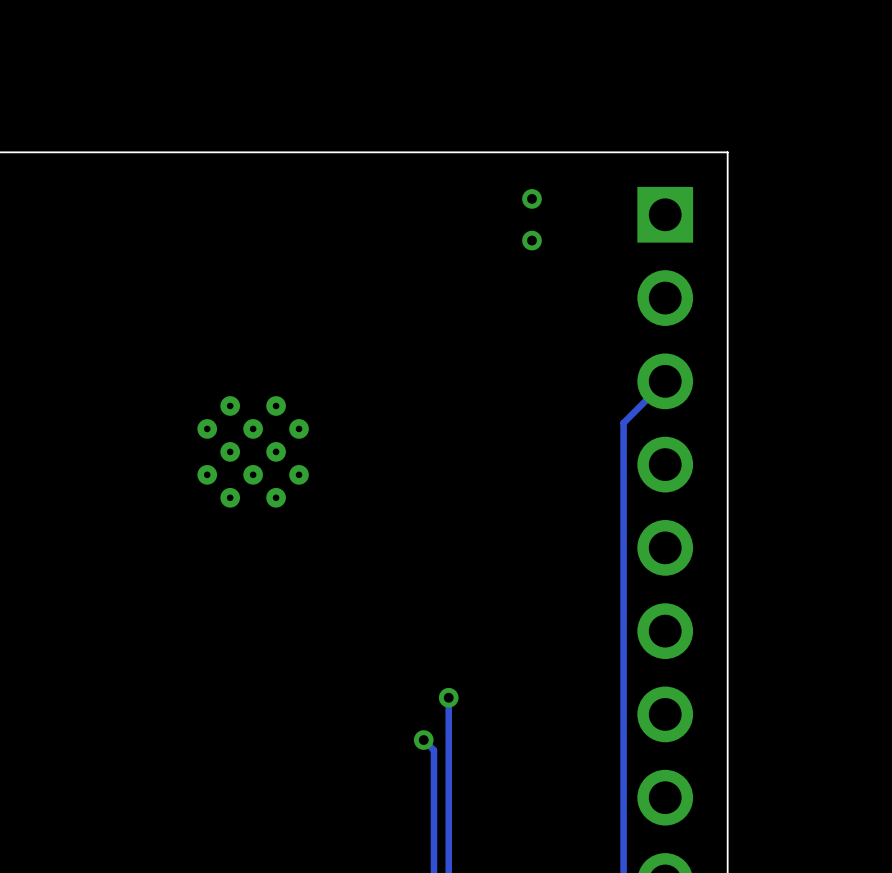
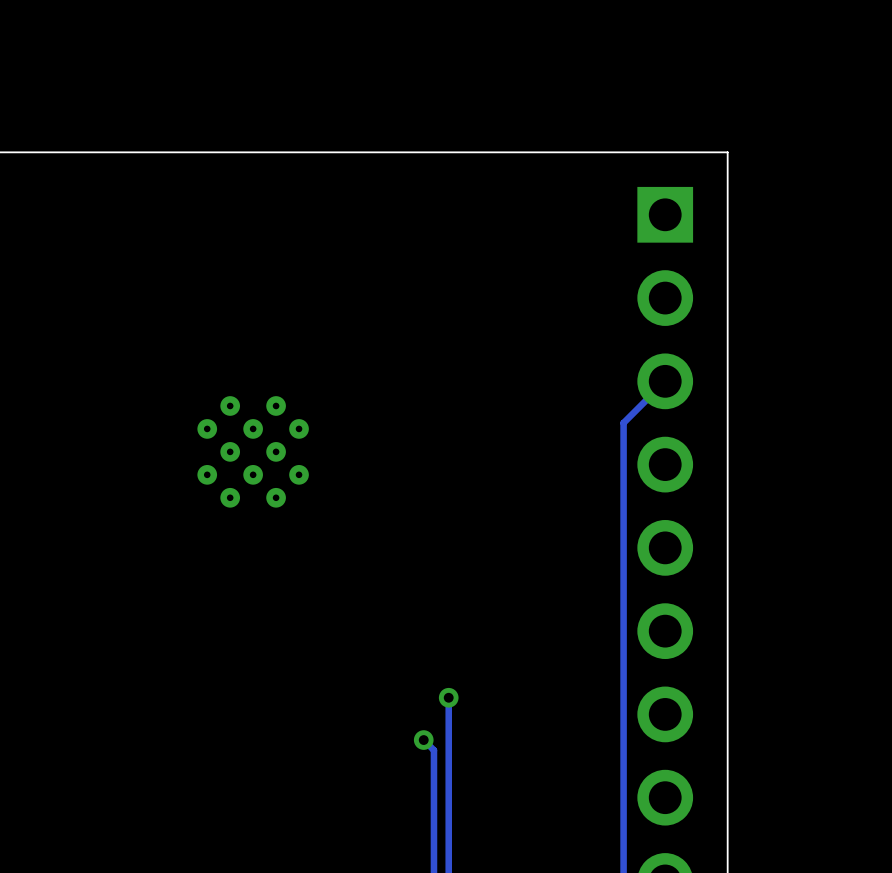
via: (531, 198) -> none
via: (531, 240) -> none

